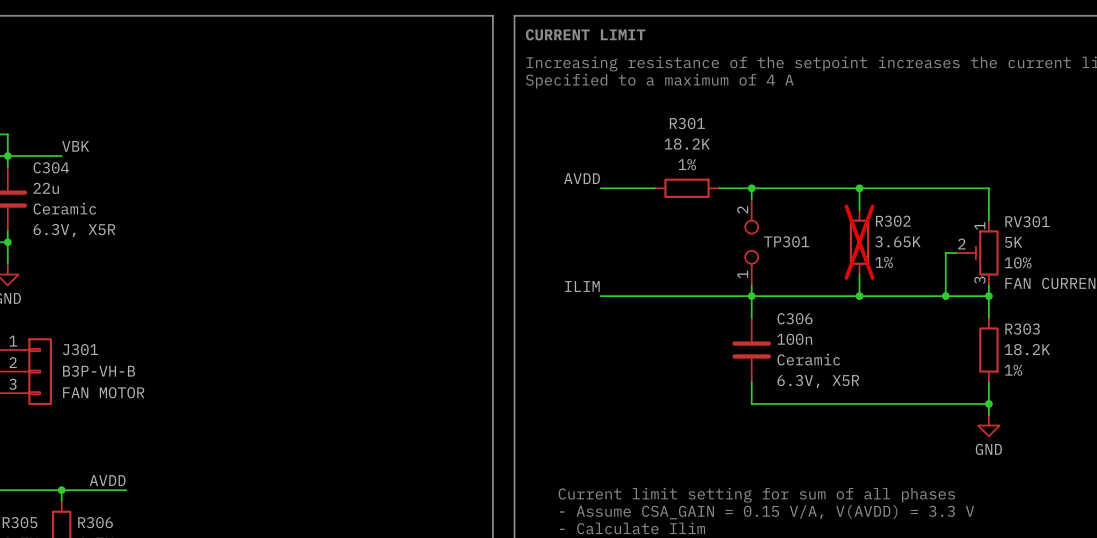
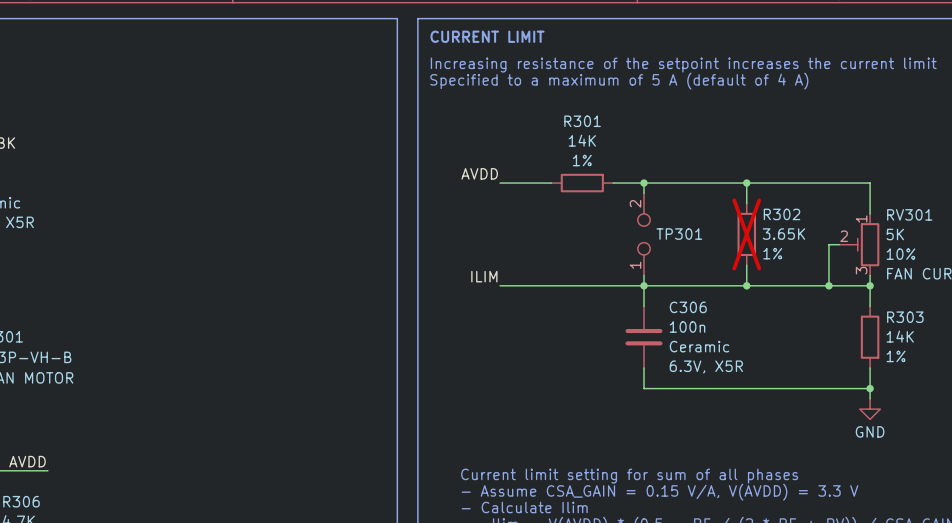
text: Specified to a maximum of 4 A (659, 81) -> Specified to a maximum of 5 A (default of 4 A) (619, 81)
R301 value: 18.2K (687, 144) -> 14K (582, 140)
R303 value: 18.2K (1027, 349) -> 14K (900, 336)

